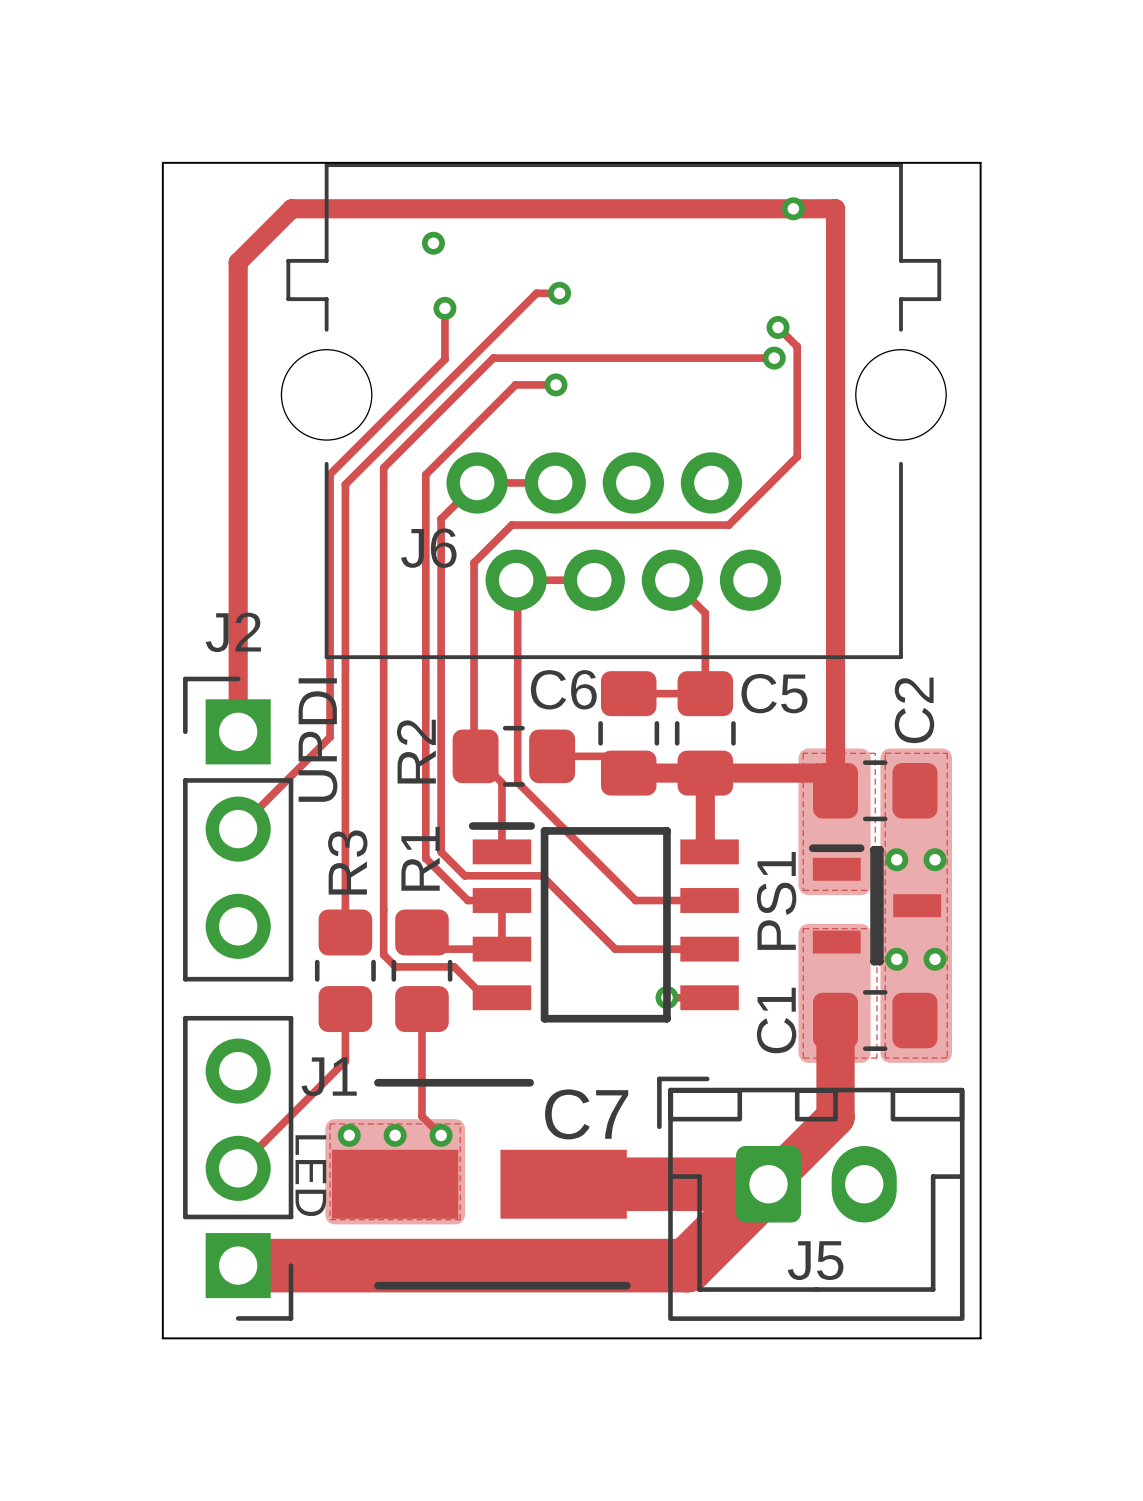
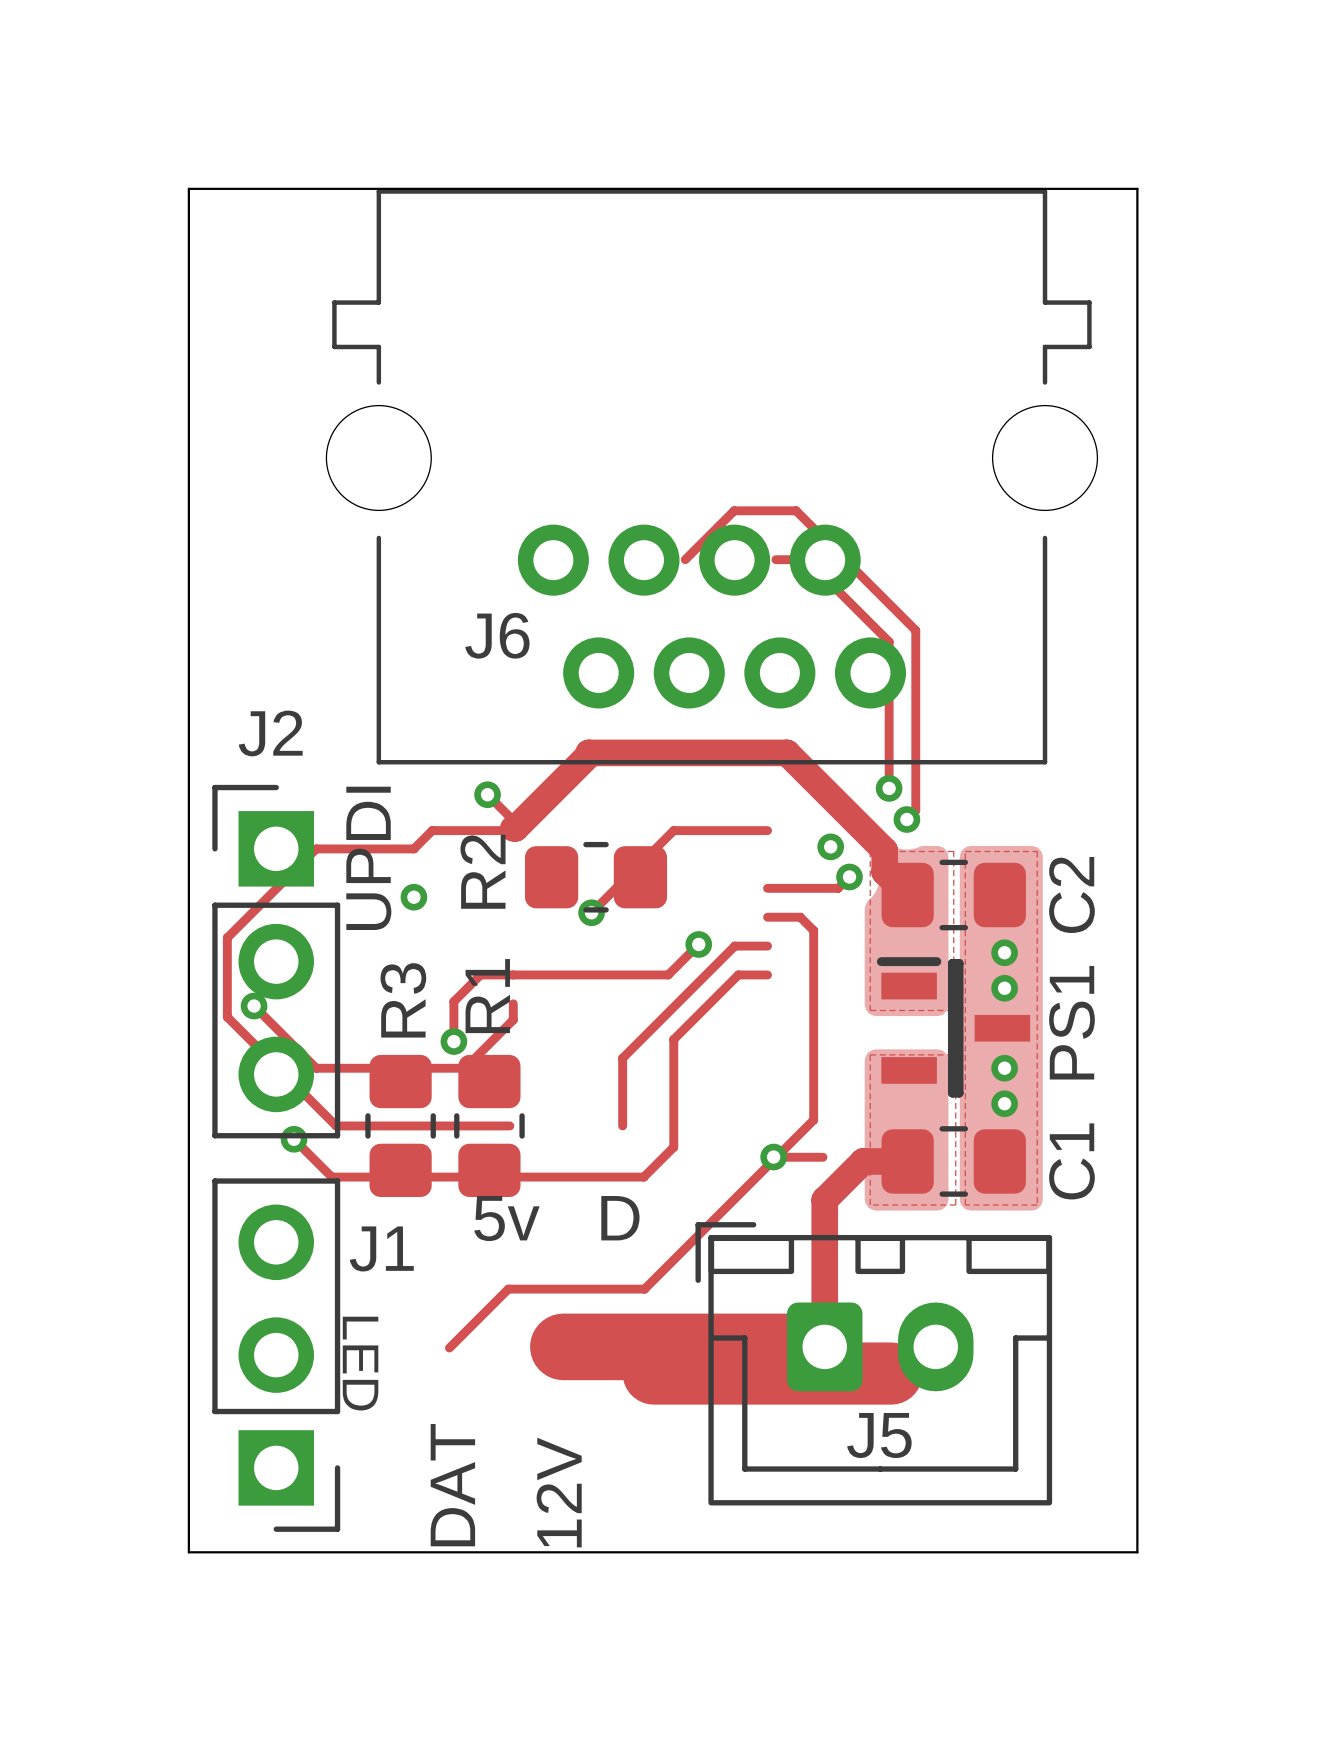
via: (793, 208) -> none
via: (433, 243) -> none
track: (559, 293) (536, 293) (345, 484) (345, 932) -> none
via: (559, 293) -> none
track: (444, 308) (444, 359) (330, 474) (330, 737) (238, 829) -> none
via: (444, 308) -> none
track: (778, 327) (797, 346) (797, 456) (728, 525) (511, 525) (474, 562) (474, 754) (501, 782) (501, 851) -> none
via: (778, 327) -> none
track: (774, 358) (493, 358) (383, 467) (383, 954) (395, 966) (454, 966) (485, 997) (501, 997) -> none
via: (774, 358) -> none
track: (555, 384) (515, 384) (425, 474) (425, 858) (467, 900) (501, 900) (501, 949) (438, 949) (421, 932) -> none
via: (555, 384) -> none
track: (555, 482) (477, 482) (441, 518) (441, 852) (464, 875) (541, 875) (615, 949) (709, 949) -> none
track: none -> (685, 559) (734, 510) (796, 510) (915, 630) (915, 810) (906, 819)
track: none -> (775, 559) (806, 559) (889, 641) (889, 788)
track: (672, 580) (705, 613) (705, 693) (628, 693) -> none
track: (589, 584) (594, 580) (516, 580) (517, 581) (517, 782) (635, 900) (709, 900) -> none
via: none -> (889, 788)
track: none -> (487, 794) (513, 820) (513, 830) (432, 830) (413, 848) (316, 848) (227, 937) (227, 1017) (336, 1125) (509, 1125)
via: none -> (487, 794)
track: (263, 706) (238, 731) (238, 262) (291, 208) (835, 208) (835, 790) (817, 773) (628, 773) (611, 756) (552, 756) -> none
via: none -> (906, 819)
C2 name position: C2 (914, 710) -> C2 (1071, 894)
track: none -> (513, 828) (515, 828) (588, 755) (588, 752) (786, 752) (884, 850) (884, 872) (907, 895)
track: none -> (767, 830) (673, 830) (591, 912)
via: none -> (830, 846)
C6: (628, 733) -> none
C5: (705, 733) -> none
zone outline: (803, 753) (803, 890) (875, 890) (875, 753) (803, 753) -> (870, 851) (870, 1010) (953, 1010) (953, 851) (870, 851)
zone outline: (885, 753) (947, 753) (947, 1058) (885, 1058) (885, 753) -> (965, 851) (1037, 851) (1037, 1205) (965, 1205) (965, 851)
track: none -> (849, 876) (838, 888) (767, 888)
via: none -> (849, 876)
via: none -> (413, 897)
track: (705, 773) (705, 847) (709, 851) -> none
via: none -> (591, 912)
track: none -> (767, 917) (800, 917) (813, 930) (813, 1120) (644, 1289) (508, 1289) (449, 1348)
C2 position: (875, 790) -> (953, 895)
track: none -> (698, 944) (668, 974) (480, 974) (453, 1001) (453, 1041)
via: none -> (698, 944)
track: none -> (767, 946) (734, 946) (622, 1058) (622, 1125)
via: none -> (1004, 952)
track: none -> (767, 974) (738, 974) (673, 1039) (673, 1147) (643, 1177) (331, 1177) (294, 1139)
via: none -> (1004, 988)
via: (896, 859) -> none
via: (935, 859) -> none
track: none -> (513, 1003) (513, 1019) (464, 1068) (316, 1068) (254, 1006)
via: none -> (254, 1006)
via: none -> (453, 1041)
PS1 name position: PS1 (776, 900) -> PS1 (1071, 1022)
PS1 position: (875, 904) -> (953, 1027)
via: none -> (1004, 1068)
part: (603, 922) -> none
zone outline: (803, 928) (803, 1058) (876, 1058) (876, 928) (803, 928) -> (870, 1054) (870, 1205) (955, 1205) (955, 1054) (870, 1054)
via: none -> (1004, 1103)
via: (896, 959) -> none
via: (935, 959) -> none
via: none -> (294, 1139)
track: none -> (907, 1161) (863, 1161) (824, 1200) (824, 1346) (562, 1348)
track: (345, 1009) (345, 1061) (238, 1168) -> none
track: (421, 1009) (421, 1116) (441, 1135) -> none
C1 name position: C1 (776, 1020) -> C1 (1071, 1161)
track: (835, 1020) (835, 1117) (687, 1265) (238, 1265) -> none
C1 position: (875, 1020) -> (953, 1161)
text: none -> 5v (506, 1218)
text: none -> D (620, 1218)
zone outline: (330, 1123) (460, 1123) (460, 1219) (330, 1219) (330, 1123) -> none
via: (349, 1135) -> none
via: (395, 1135) -> none
via: (441, 1135) -> none
C7: (481, 1184) -> none
J5 position: (810, 1198) -> (873, 1363)
text: none -> DAT (452, 1485)
text: none -> 12V (559, 1492)

